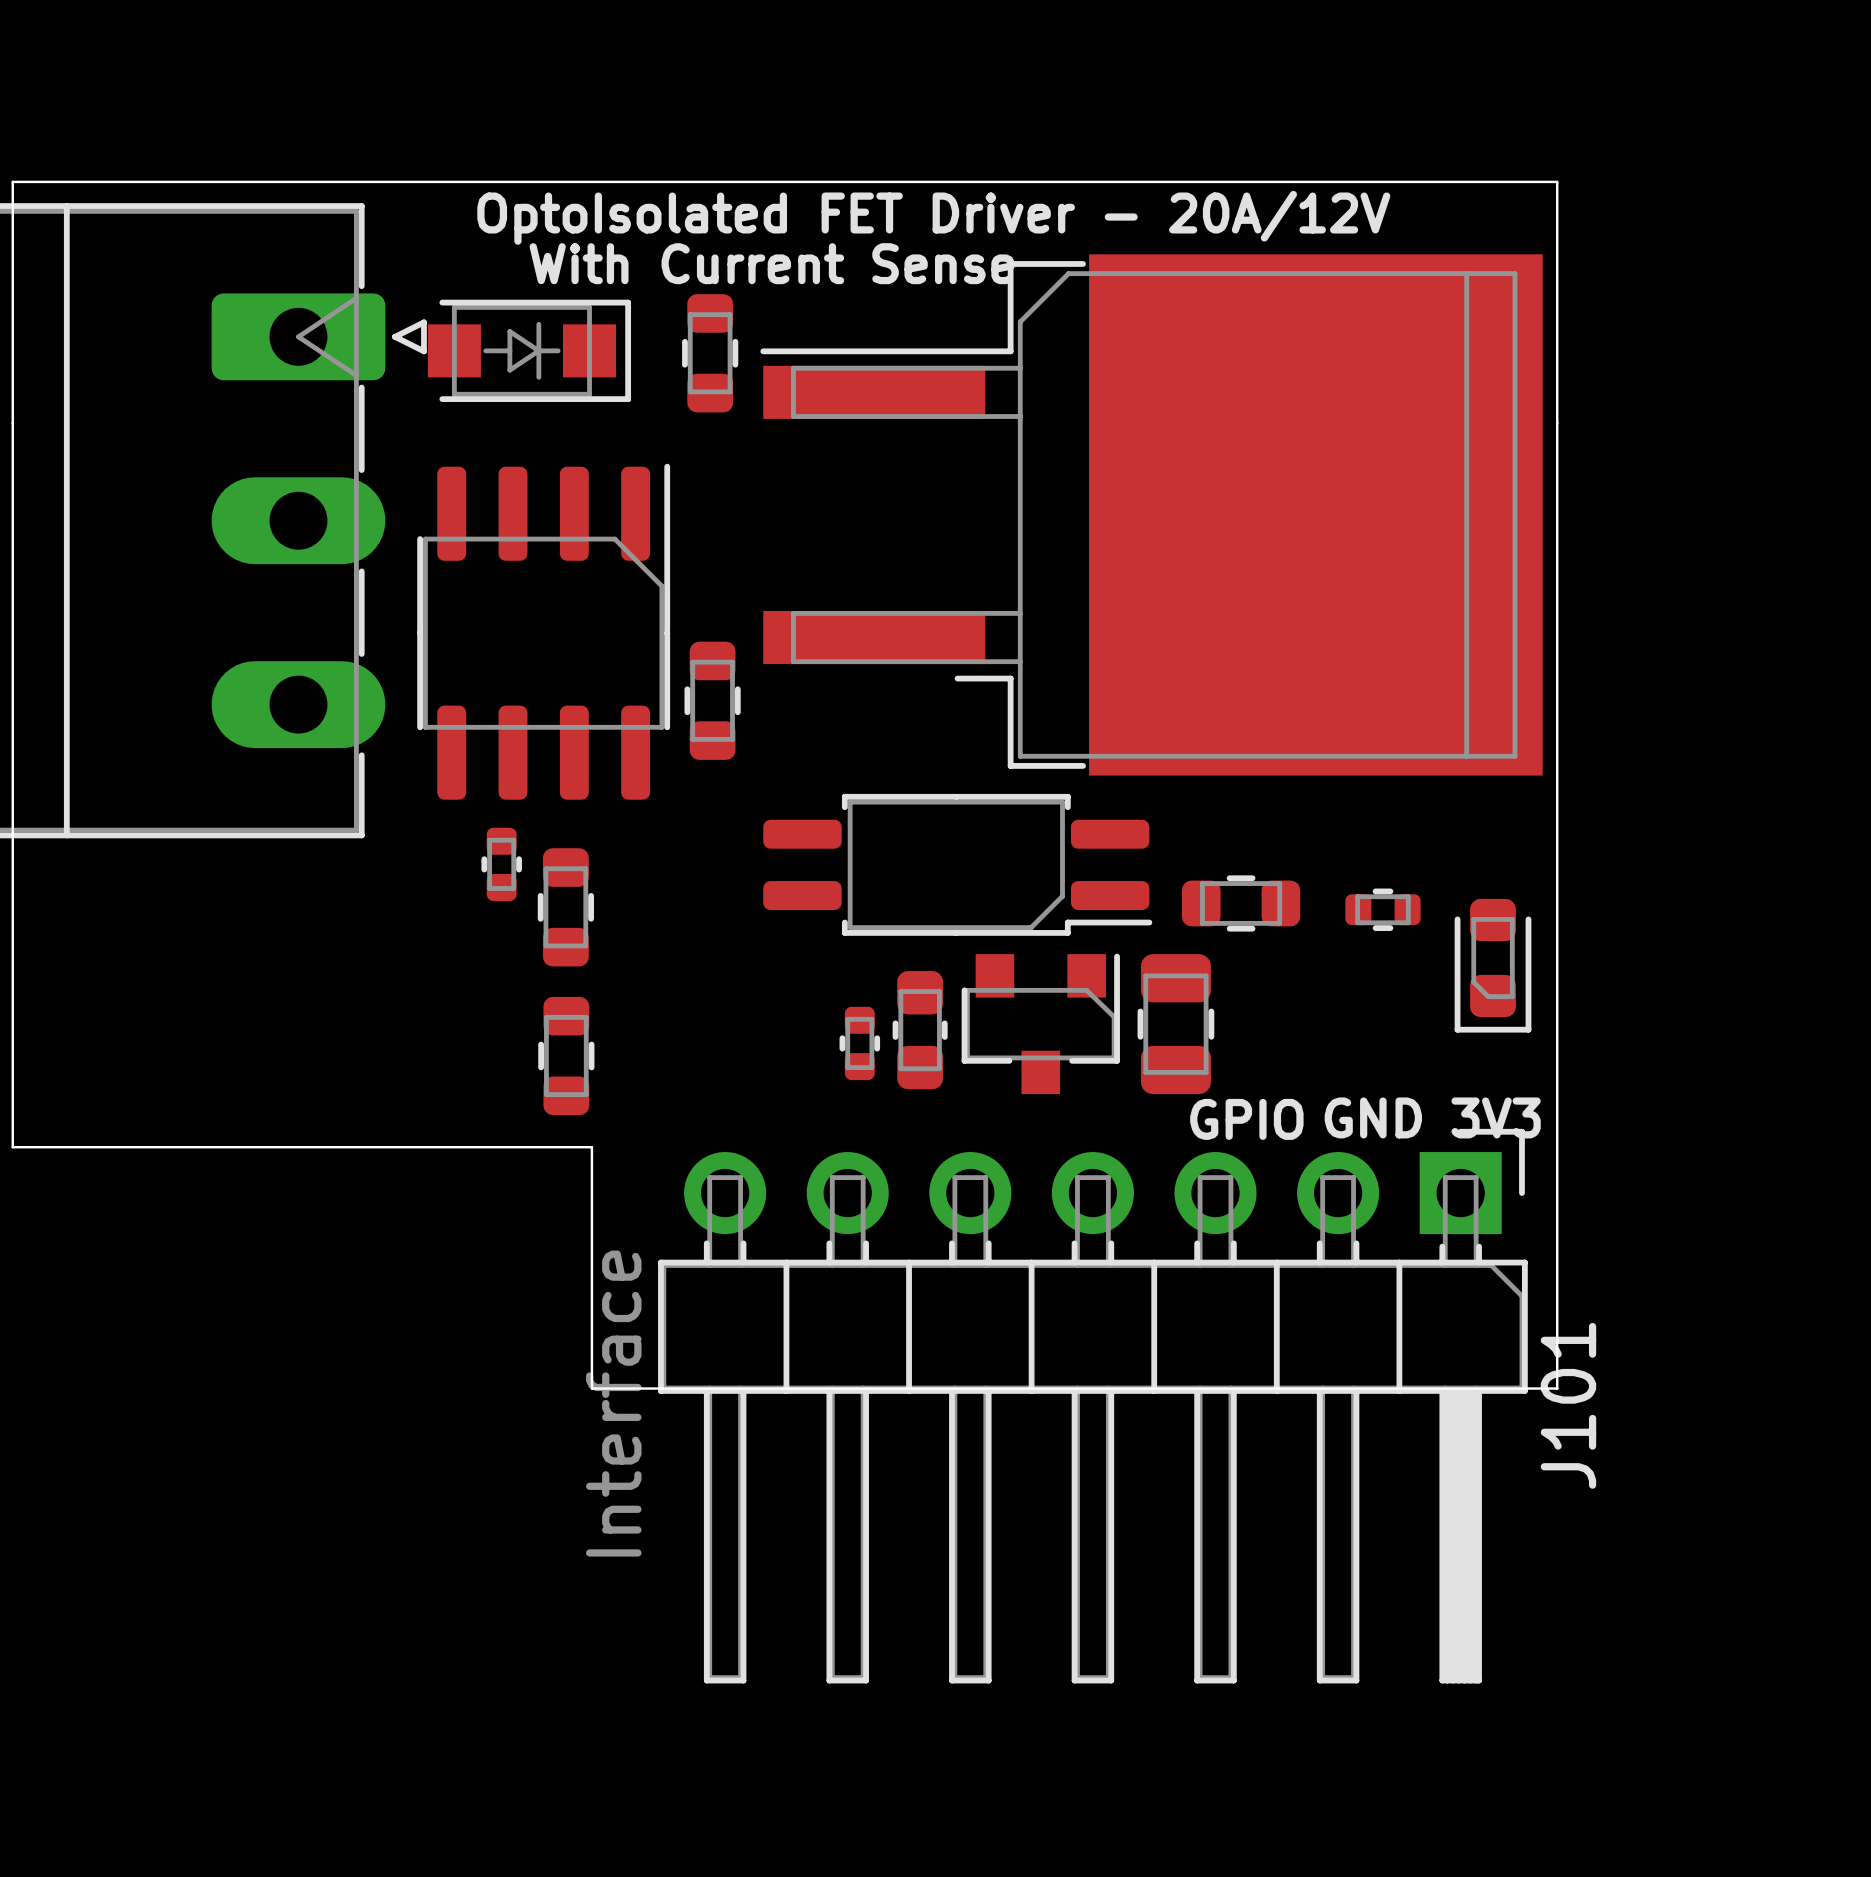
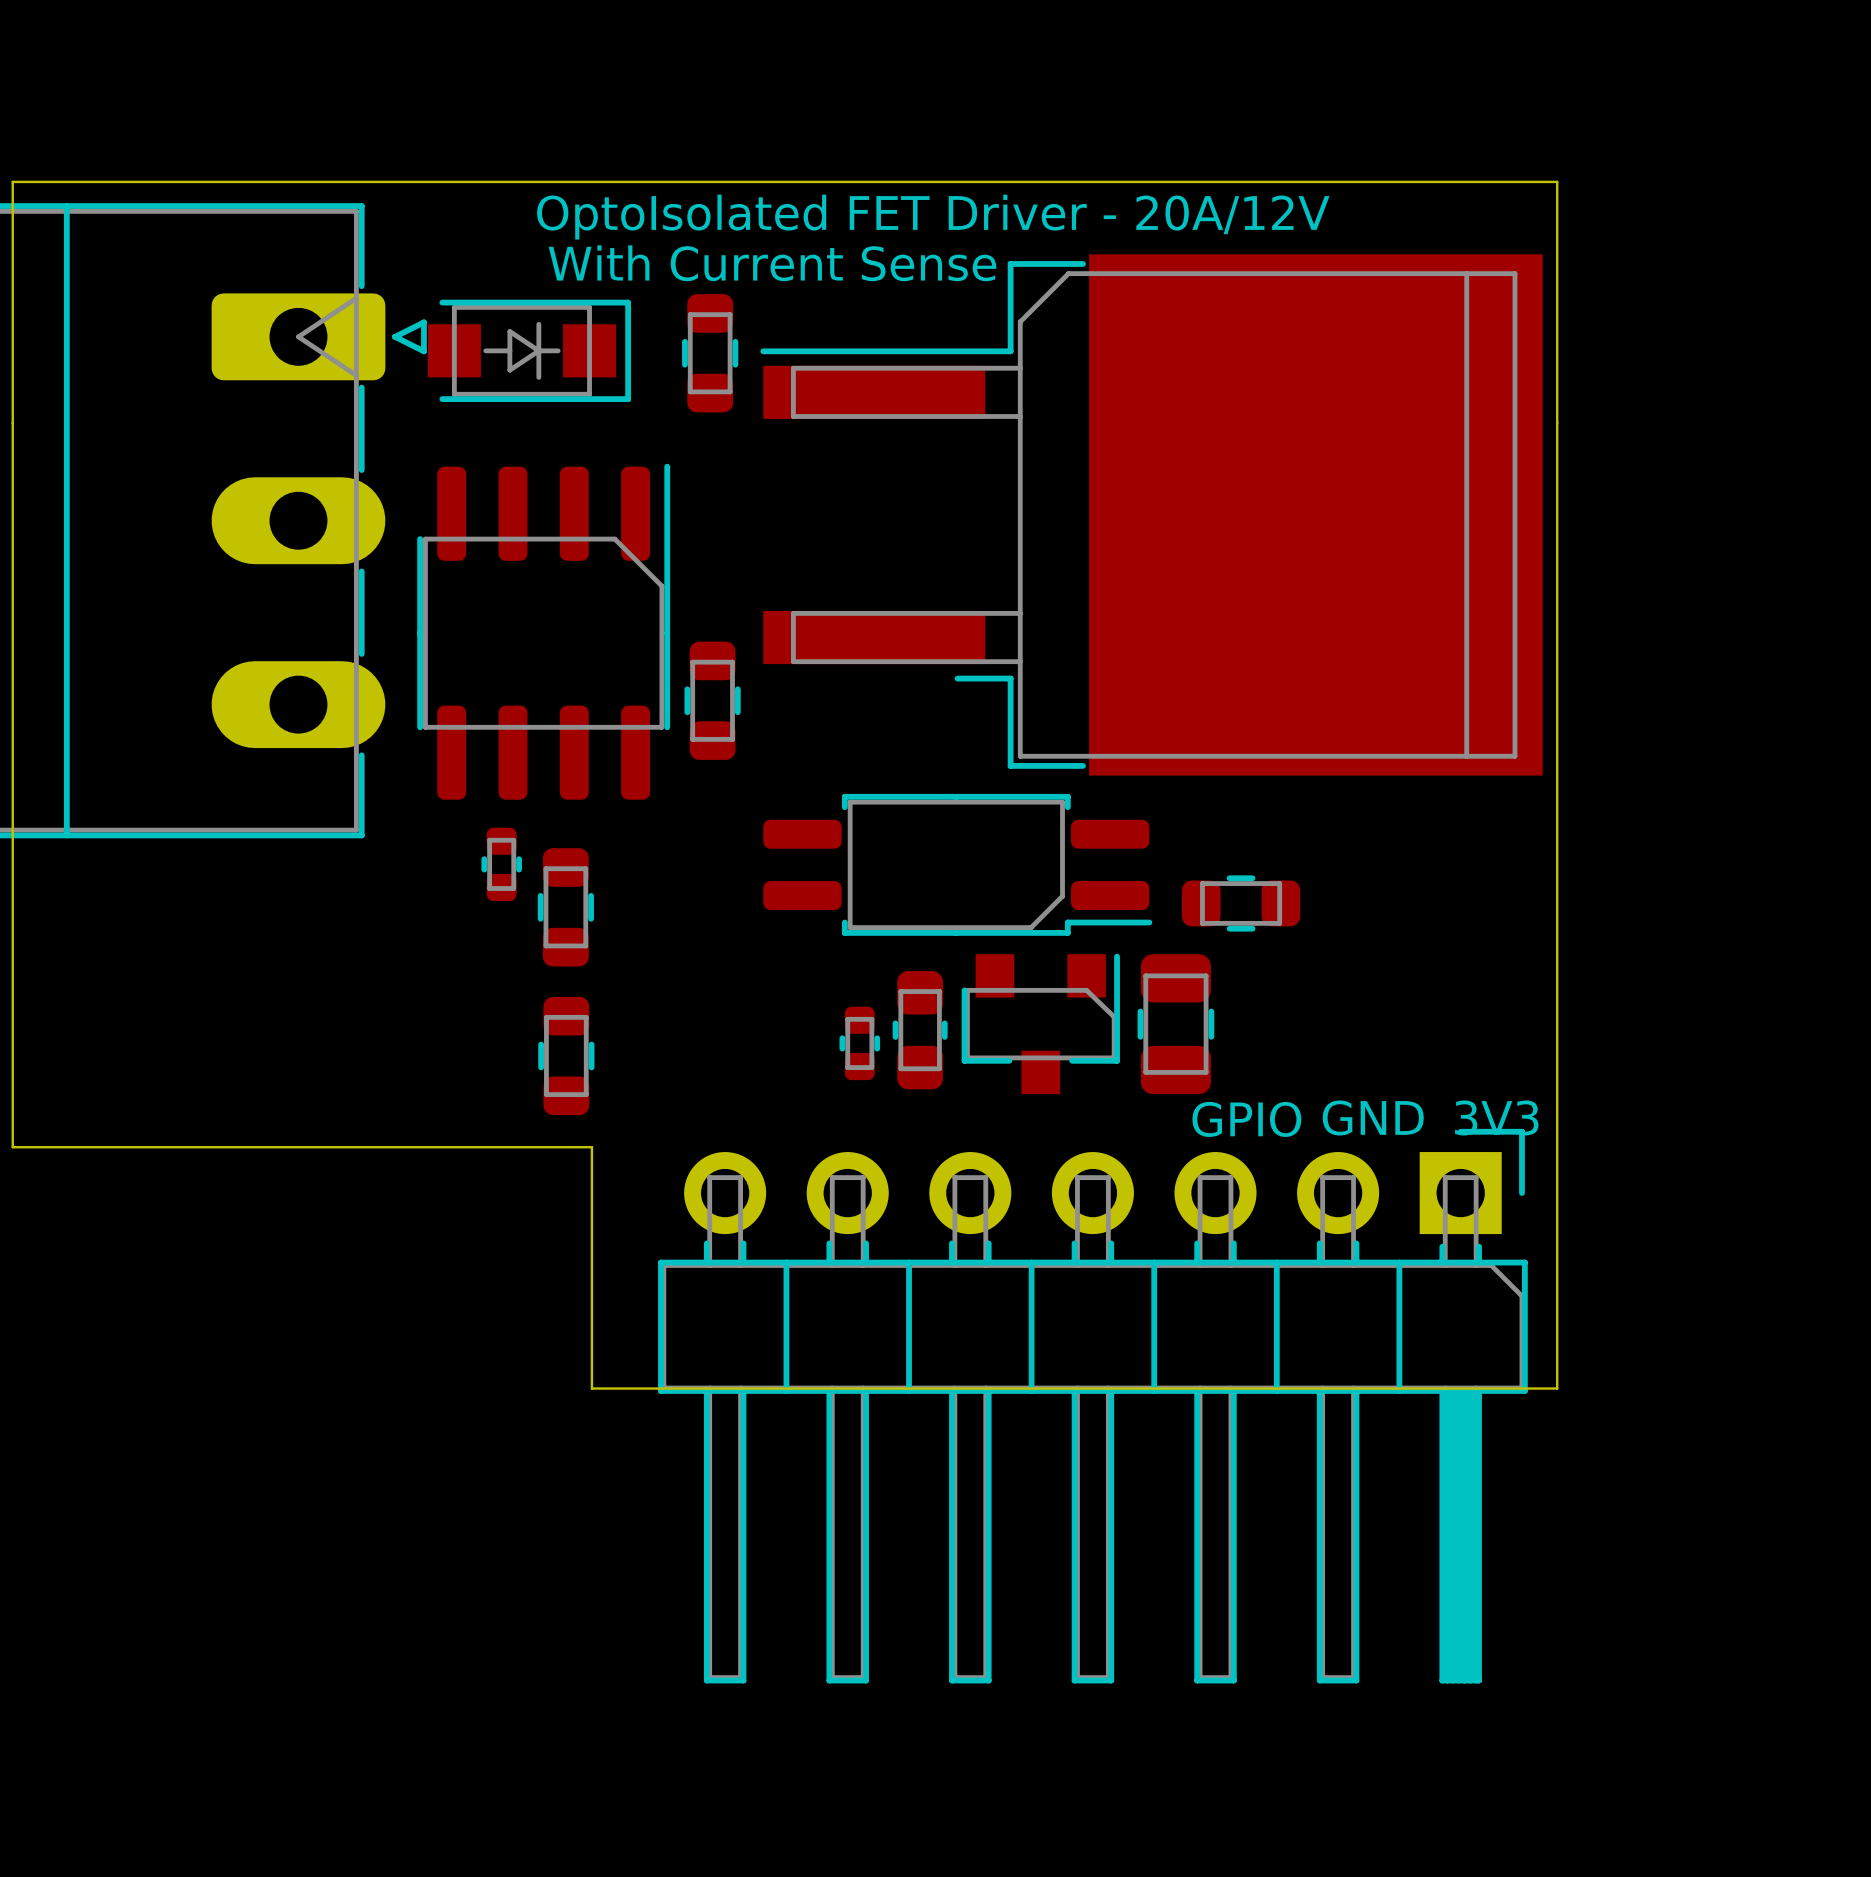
part: (1382, 909) -> none
part: (1493, 965) -> none
J101 value: Interface (613, 1403) -> none
J101 name: J101 (1568, 1405) -> none

